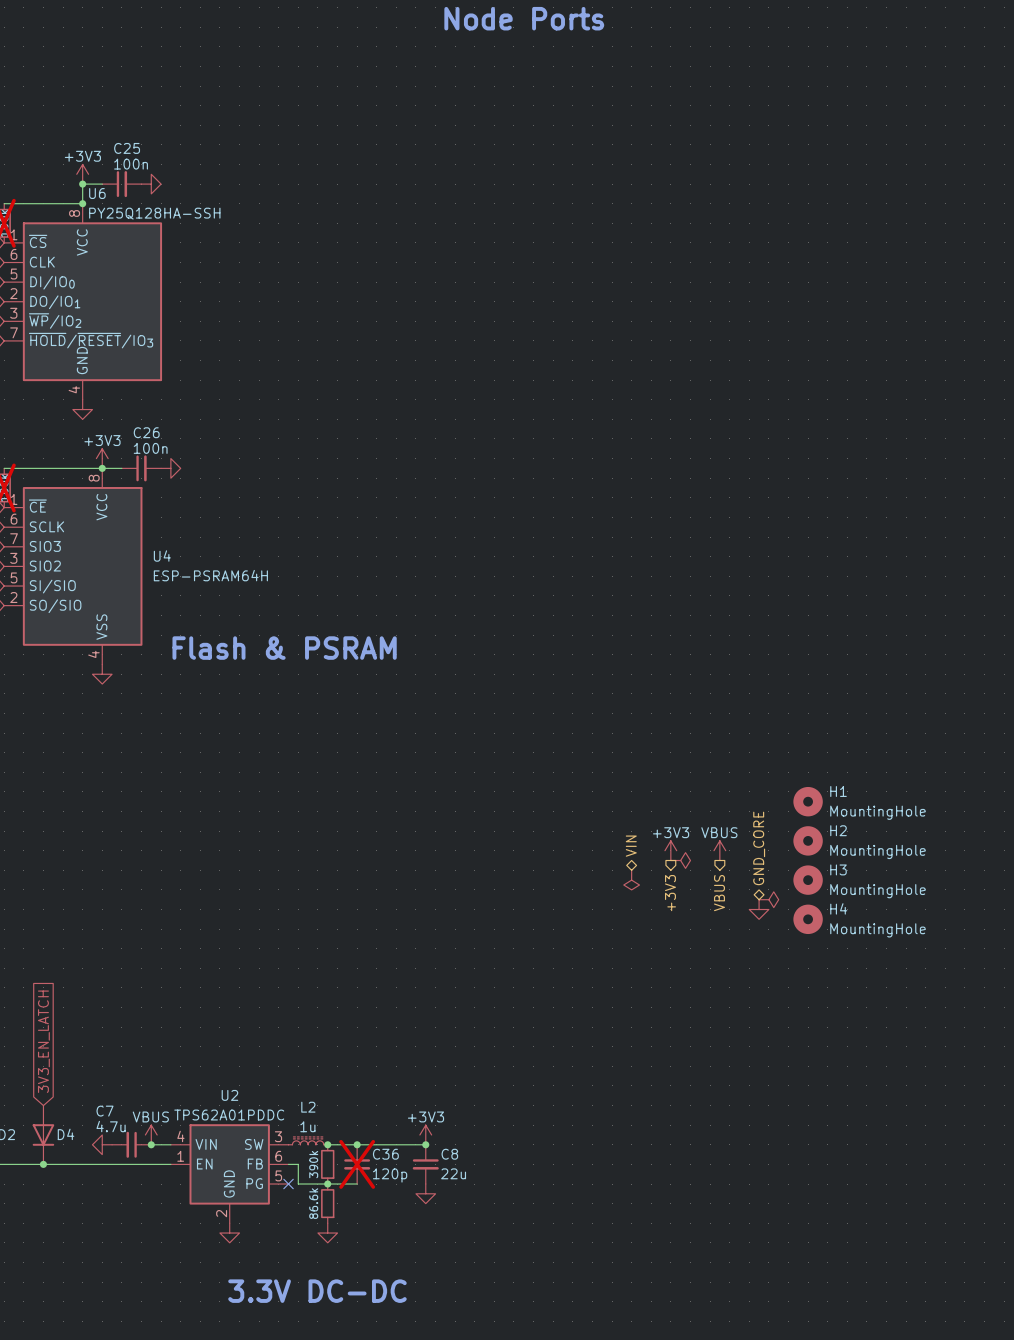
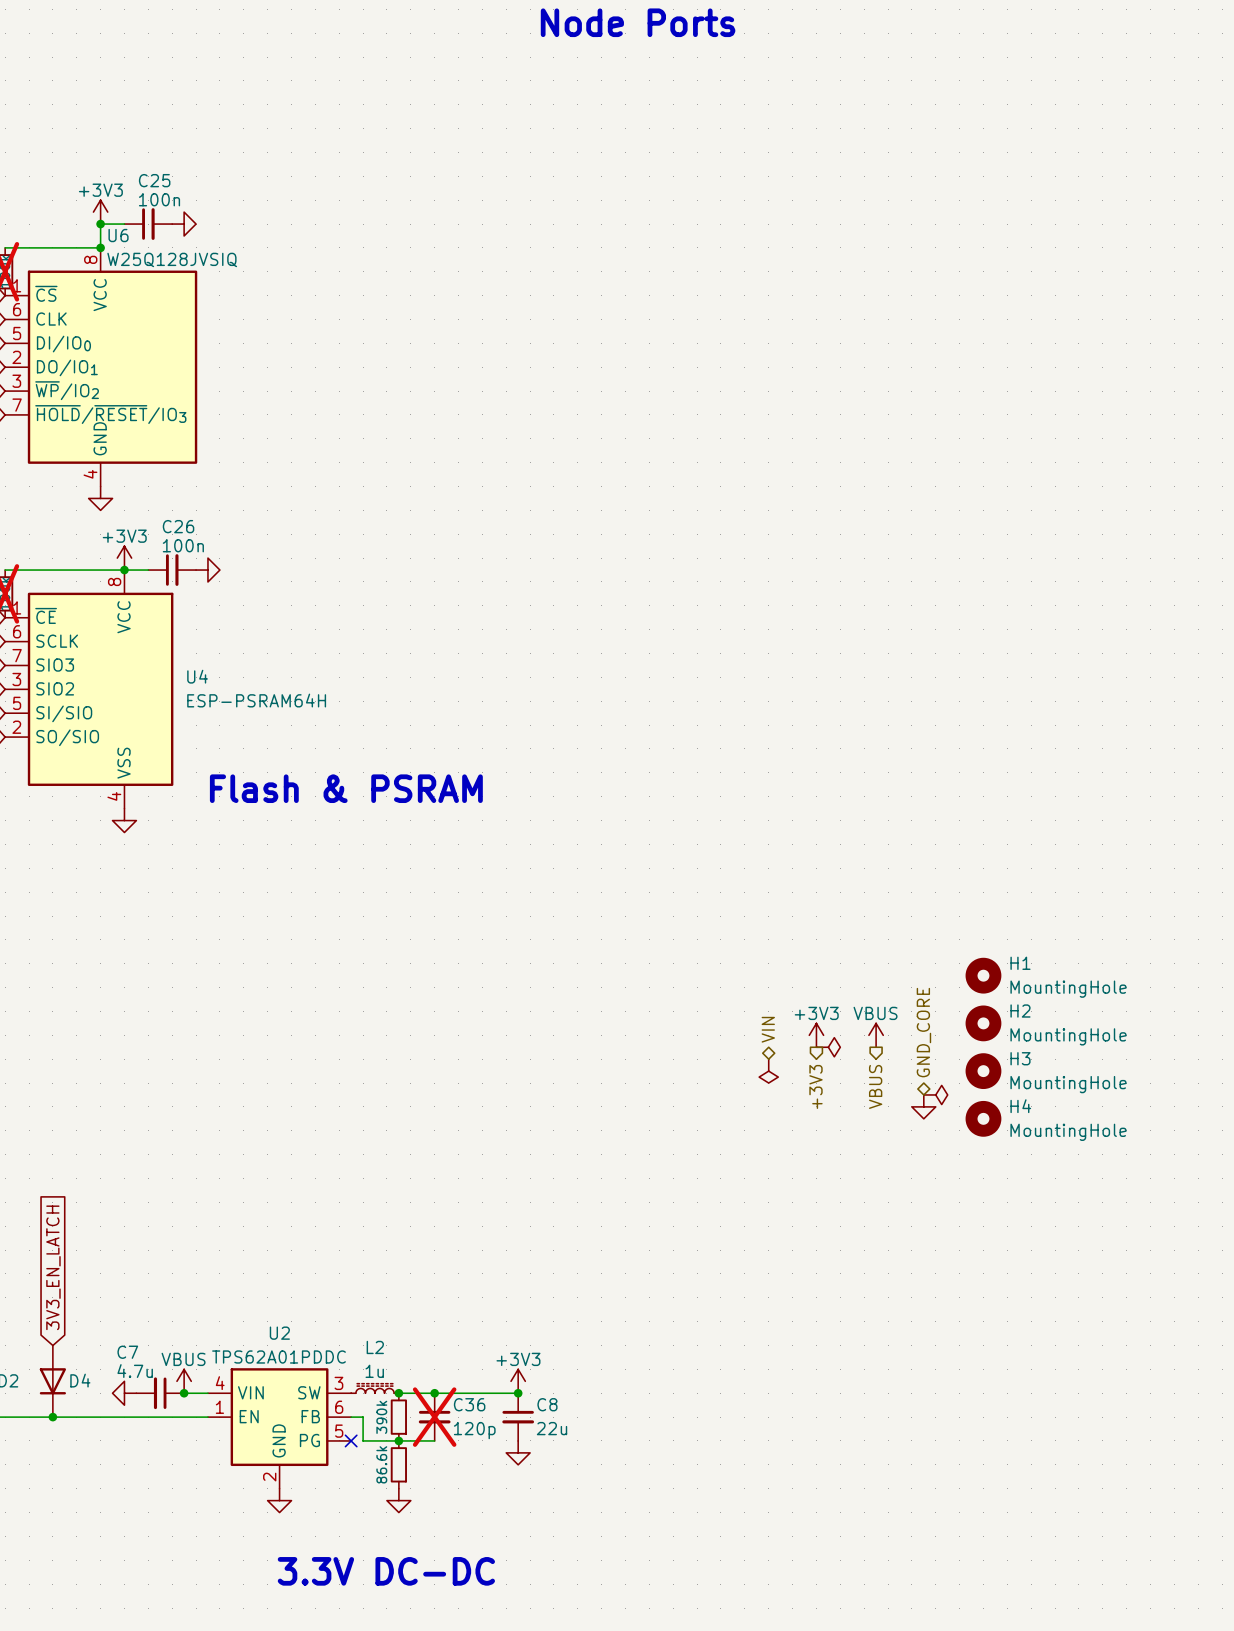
U6 value: PY25Q128HA-SSH (154, 213) -> W25Q128JVSIQ (172, 259)

